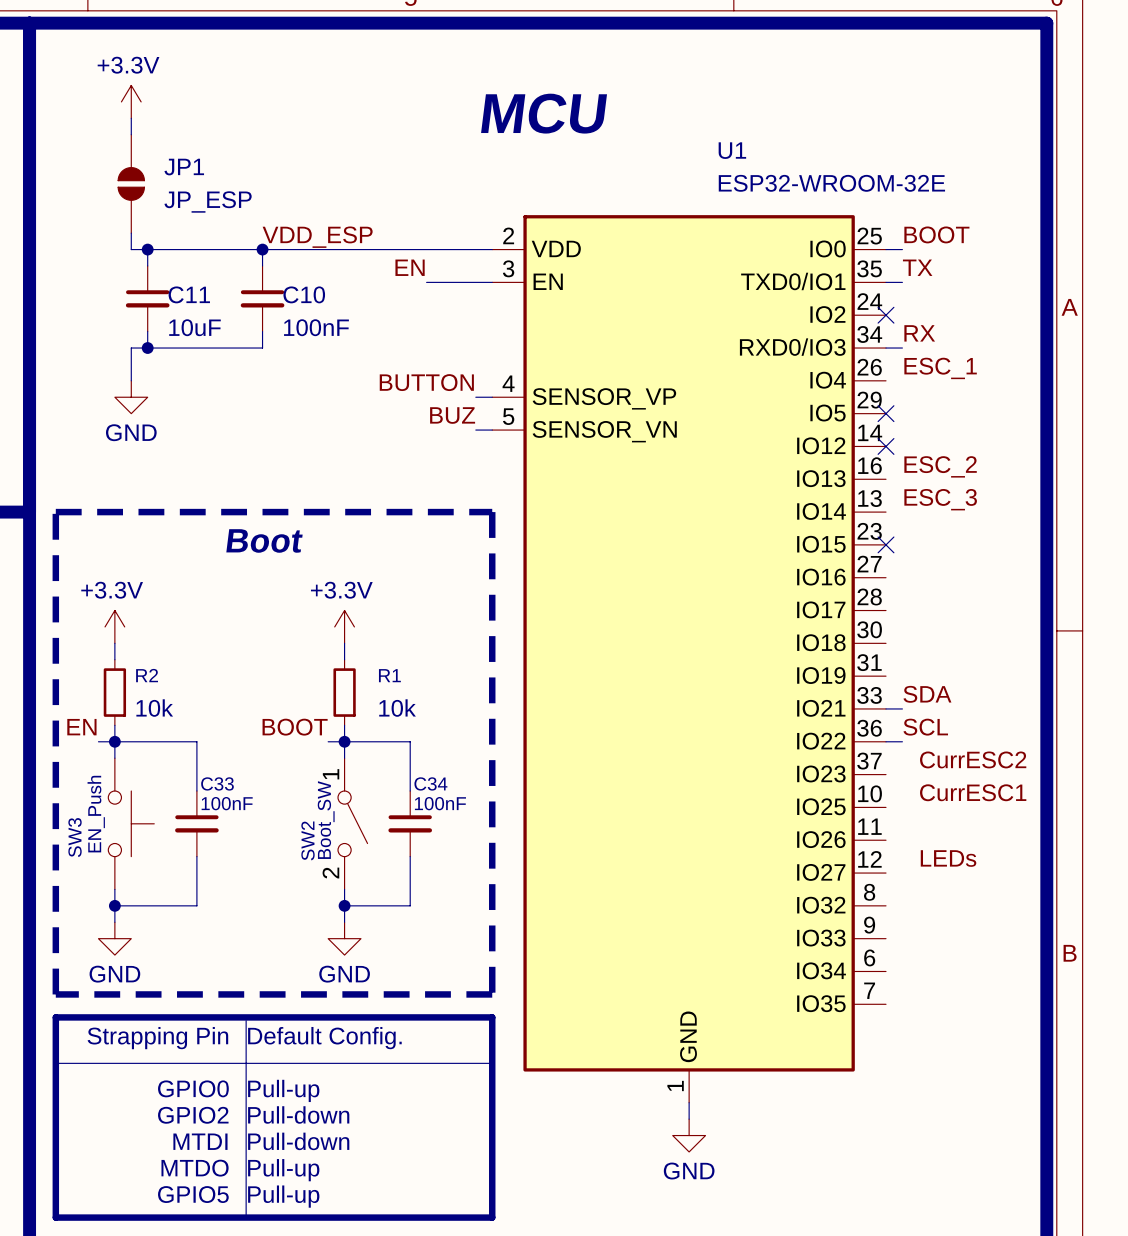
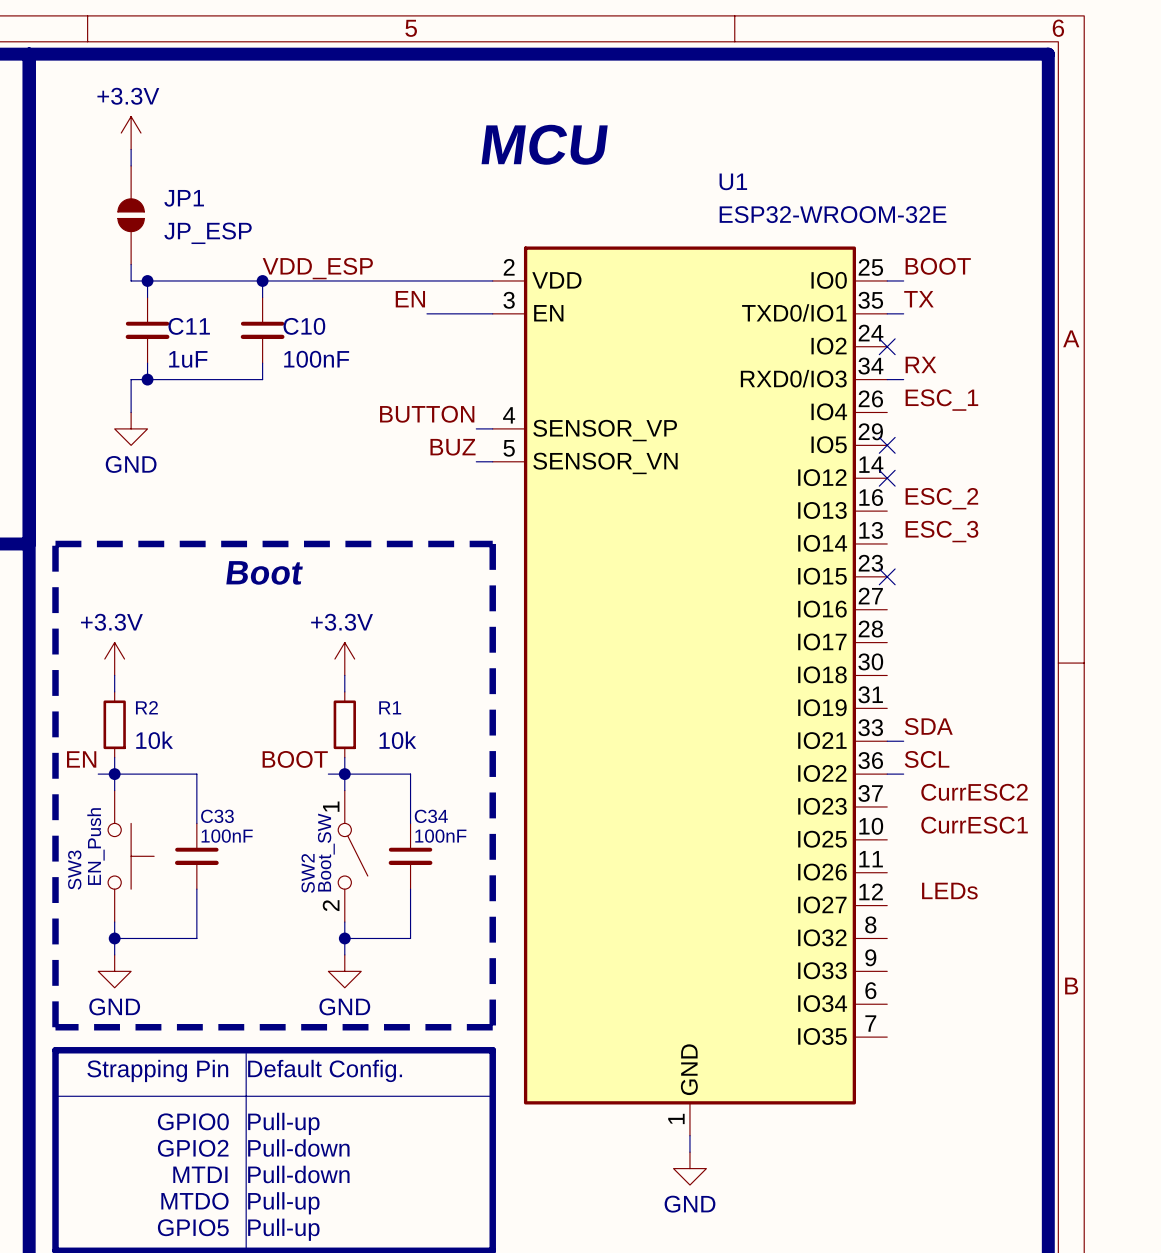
C11 value: 10uF (194, 327) -> 1uF (188, 359)

